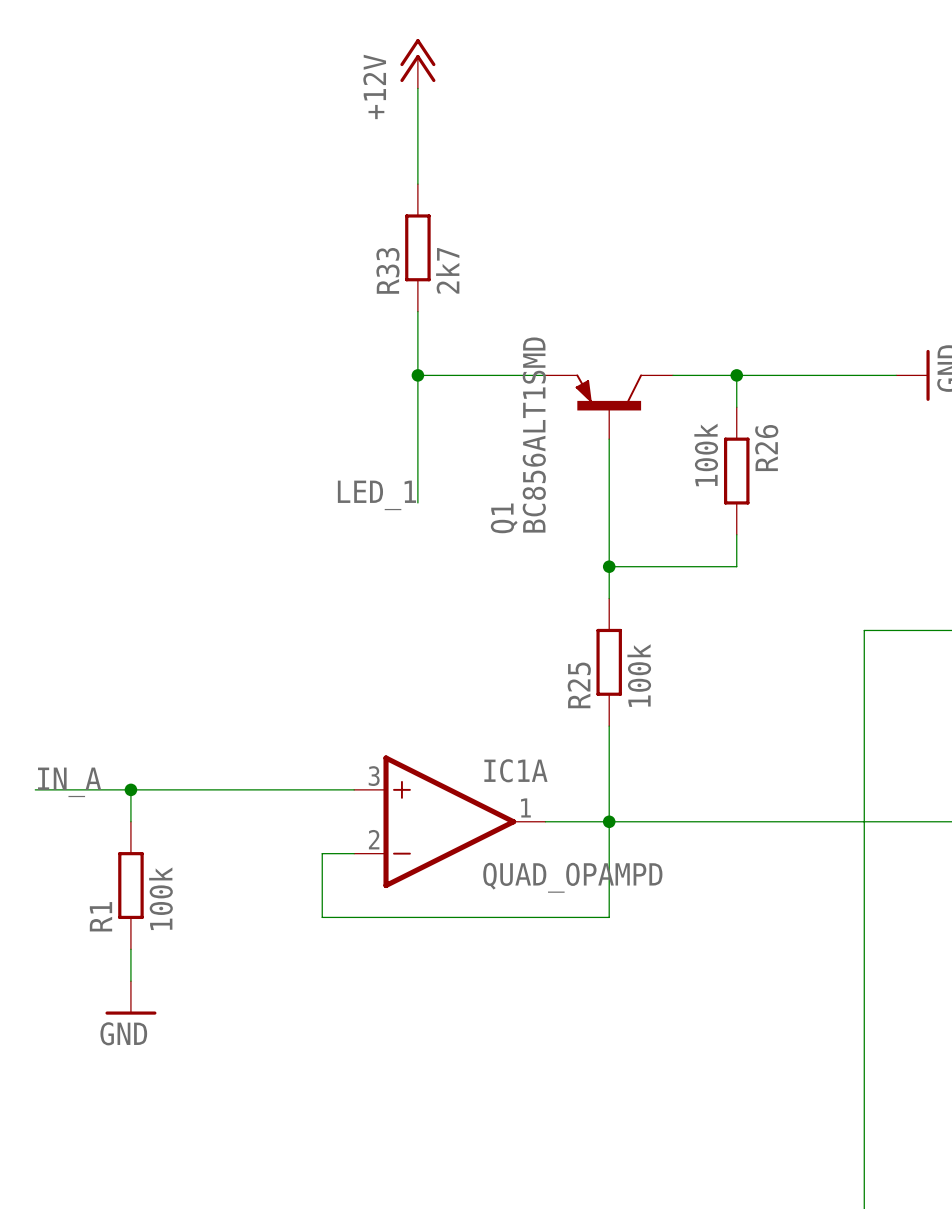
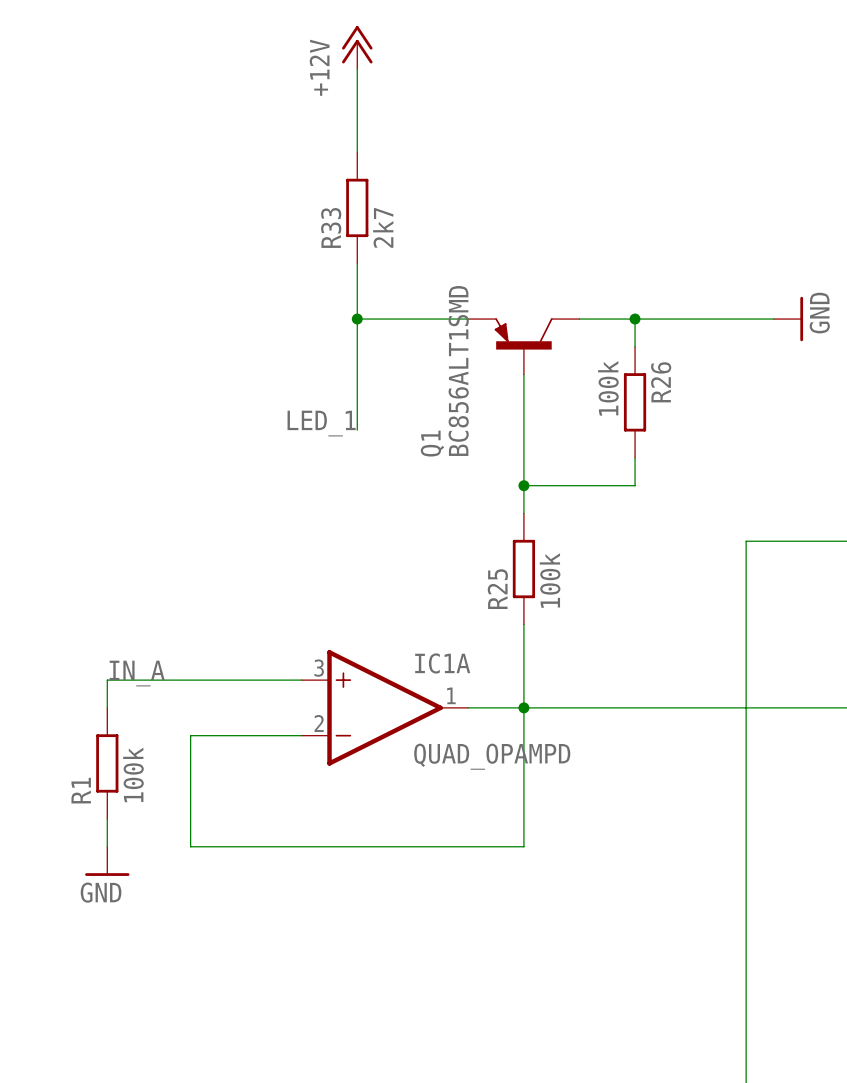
label position: IN_A (69, 782) -> IN_A (137, 673)
wire: (35, 789) (130, 789) -> none
junction: (130, 789) -> none
wire: (322, 853) (322, 917) (609, 917) -> (273, 735) (190, 735) (190, 846) (523, 846) (523, 791)

